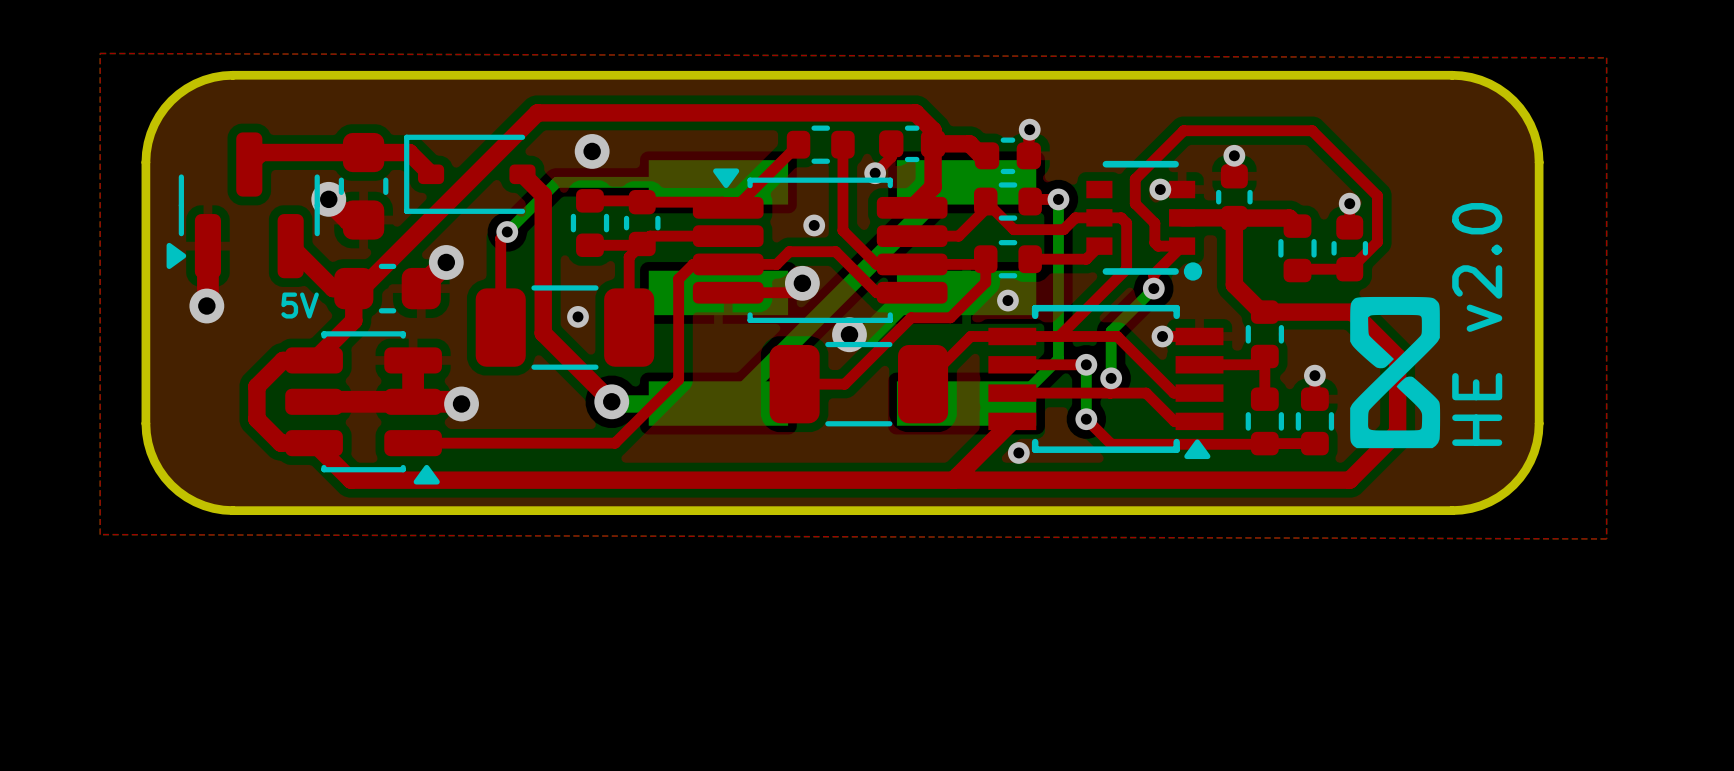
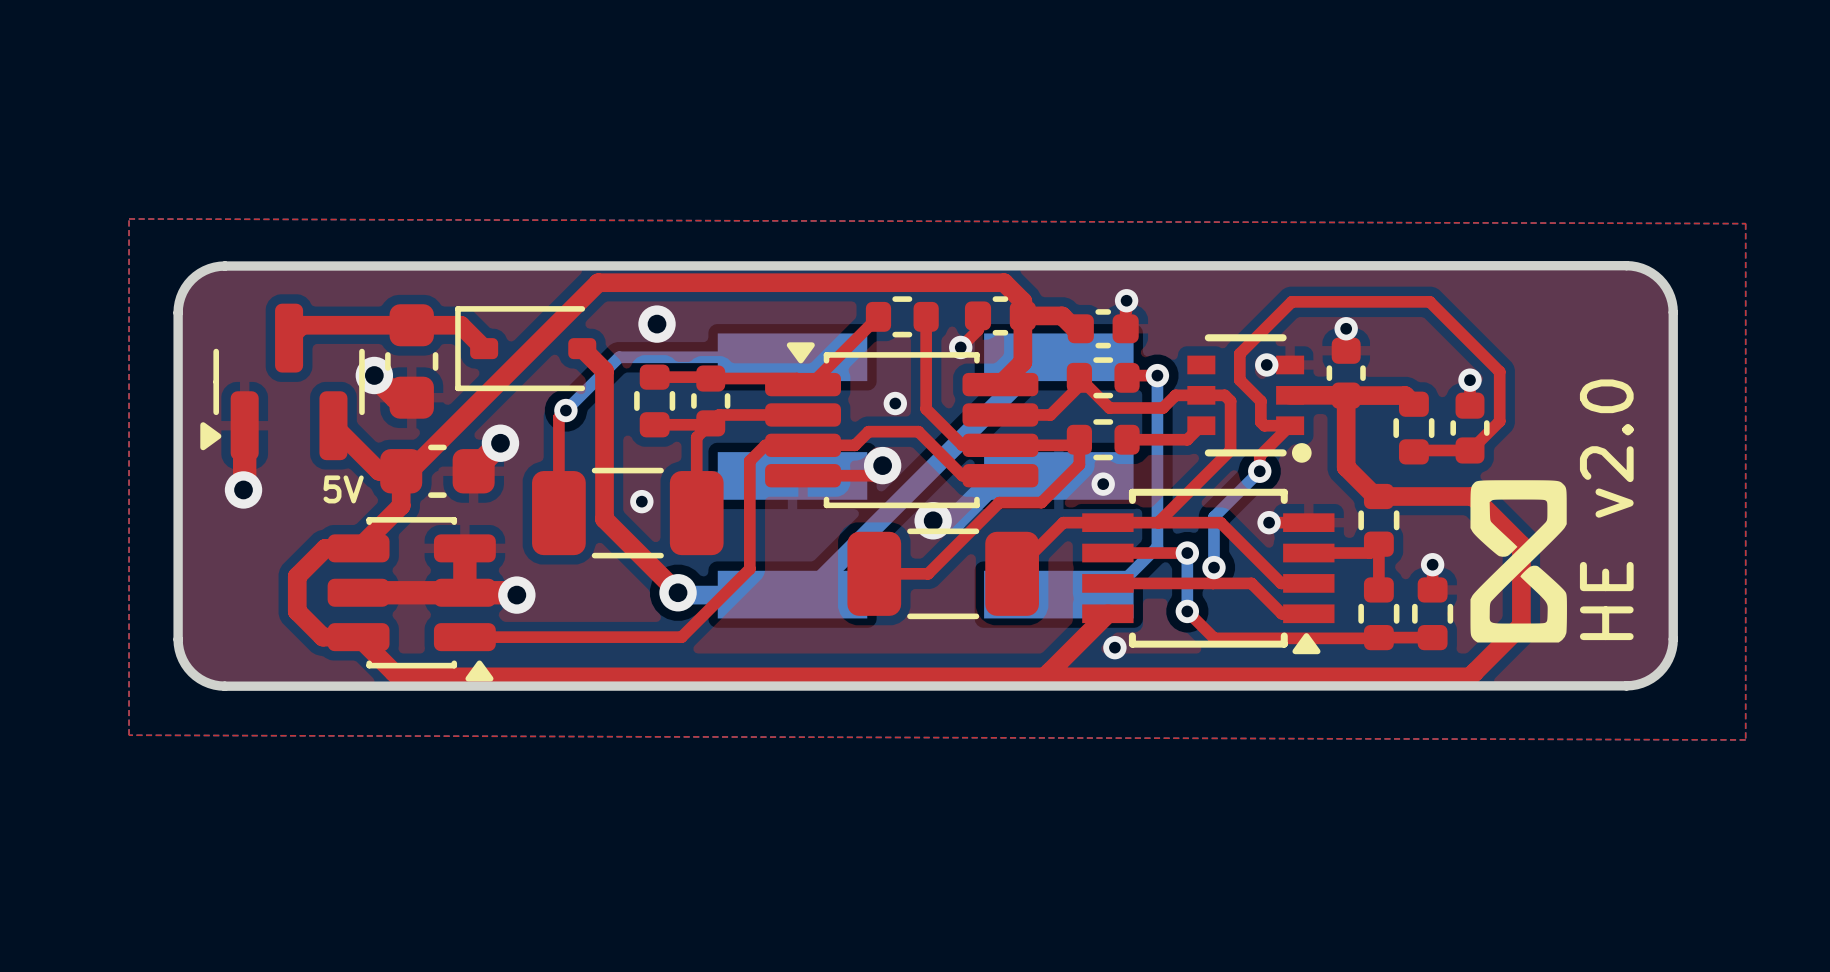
board edge: (145, 162) (150, 133) (159, 116) (171, 100) (186, 88) (204, 80) (232, 75) (1461, 75) (1489, 83) (1506, 94) (1520, 108) (1534, 133) (1539, 162) -> (178, 335) (178, 307) (185, 287) (191, 279) (204, 270) (224, 266) (1626, 265) (1636, 266) (1651, 272) (1666, 287) (1672, 307) (1673, 335)
board edge: (145, 423) (150, 452) (159, 469) (171, 485) (186, 497) (204, 505) (232, 510) (1461, 510) (1489, 502) (1506, 491) (1520, 477) (1534, 452) (1539, 423) -> (178, 616) (178, 644) (185, 664) (191, 672) (204, 681) (224, 686) (1626, 685) (1641, 683) (1651, 678) (1666, 664) (1672, 644) (1673, 616)

